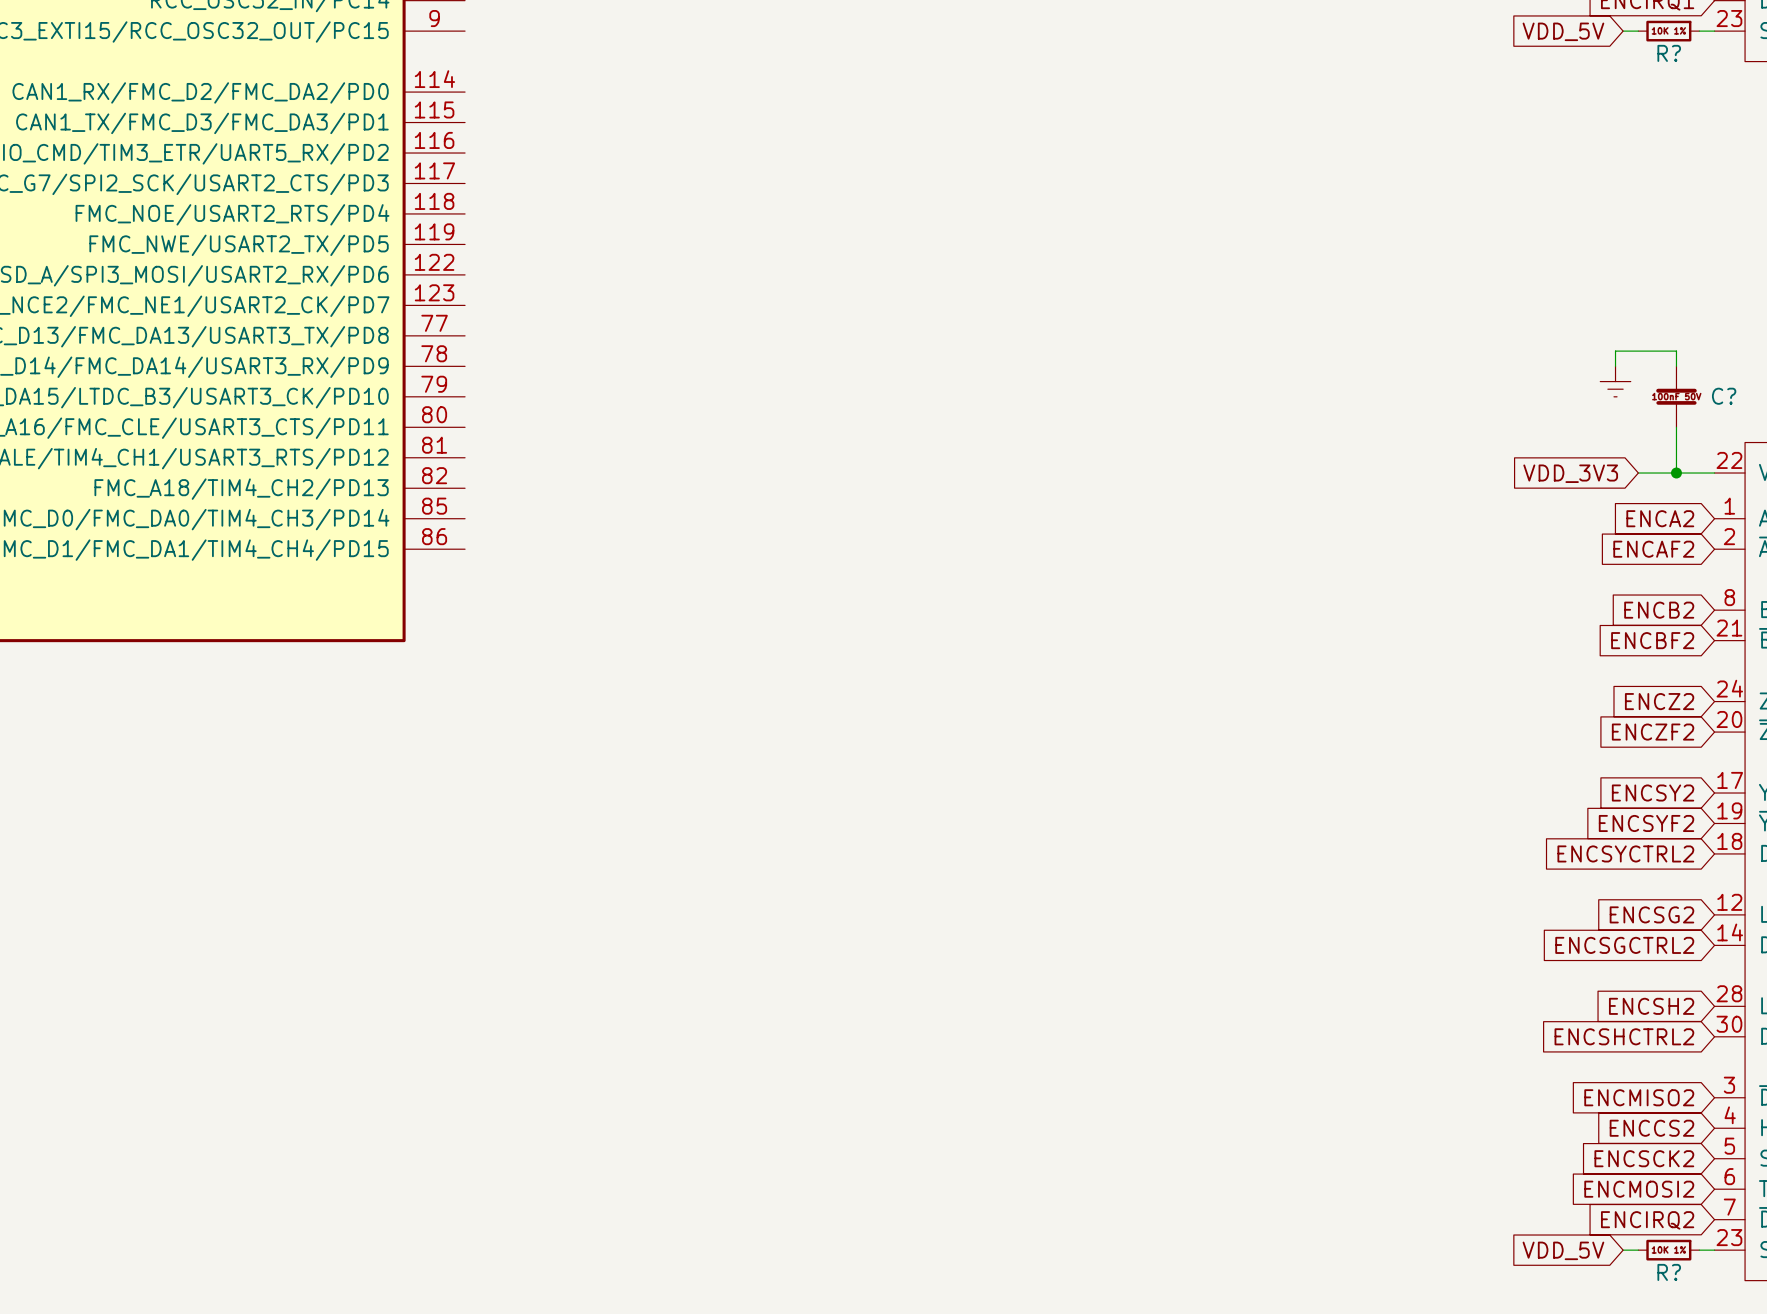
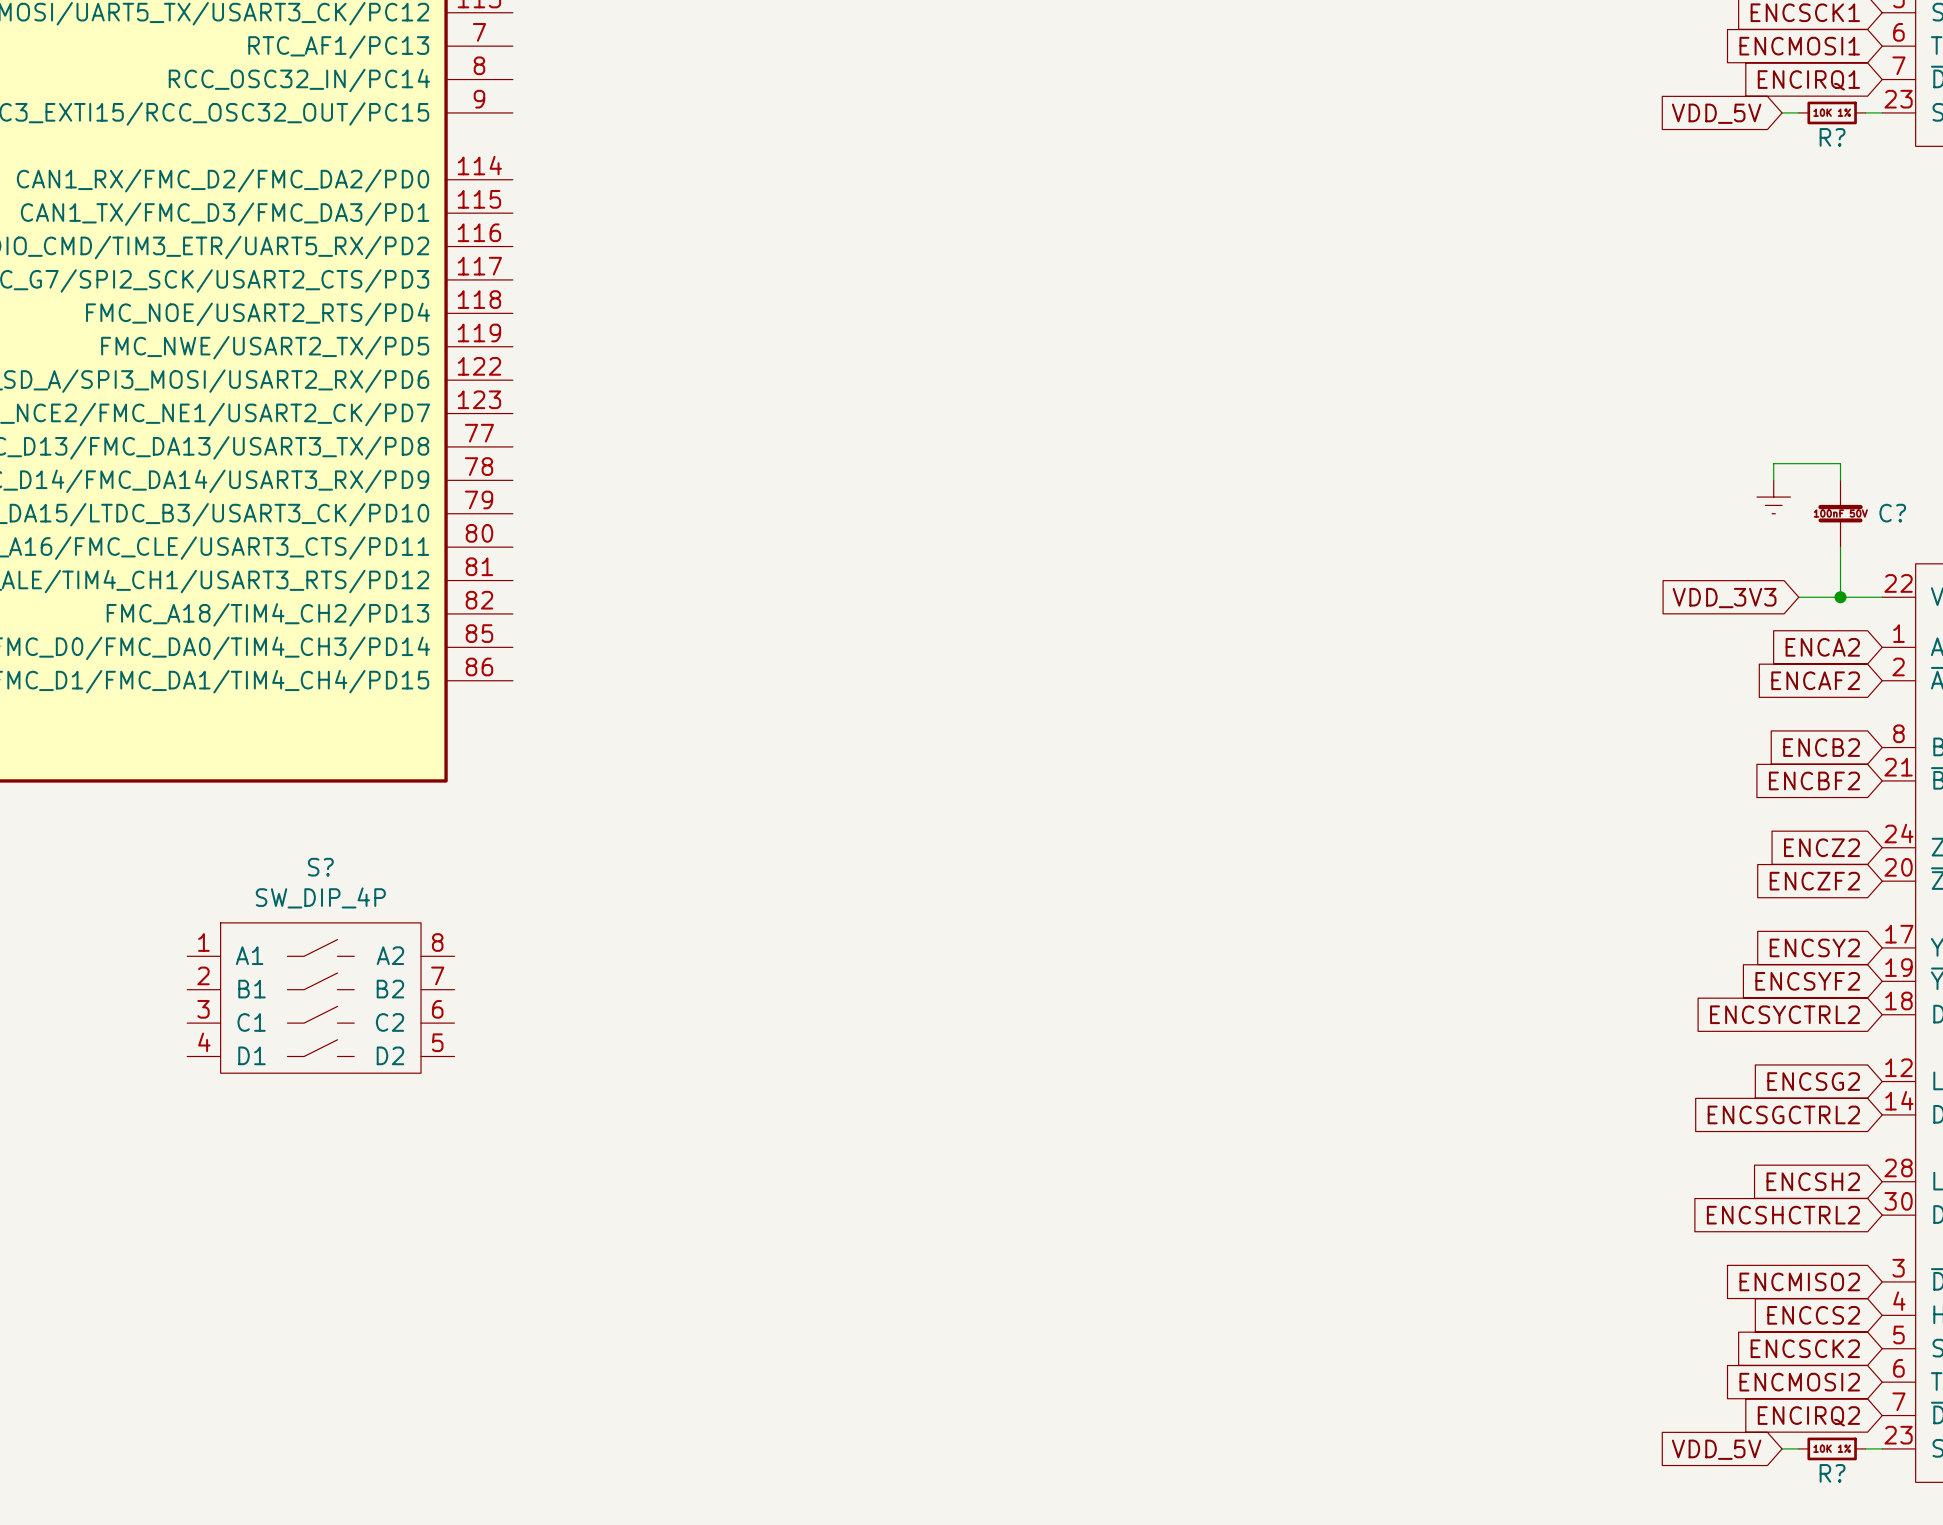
S?: none -> SW_DIP_4P (320, 998)

